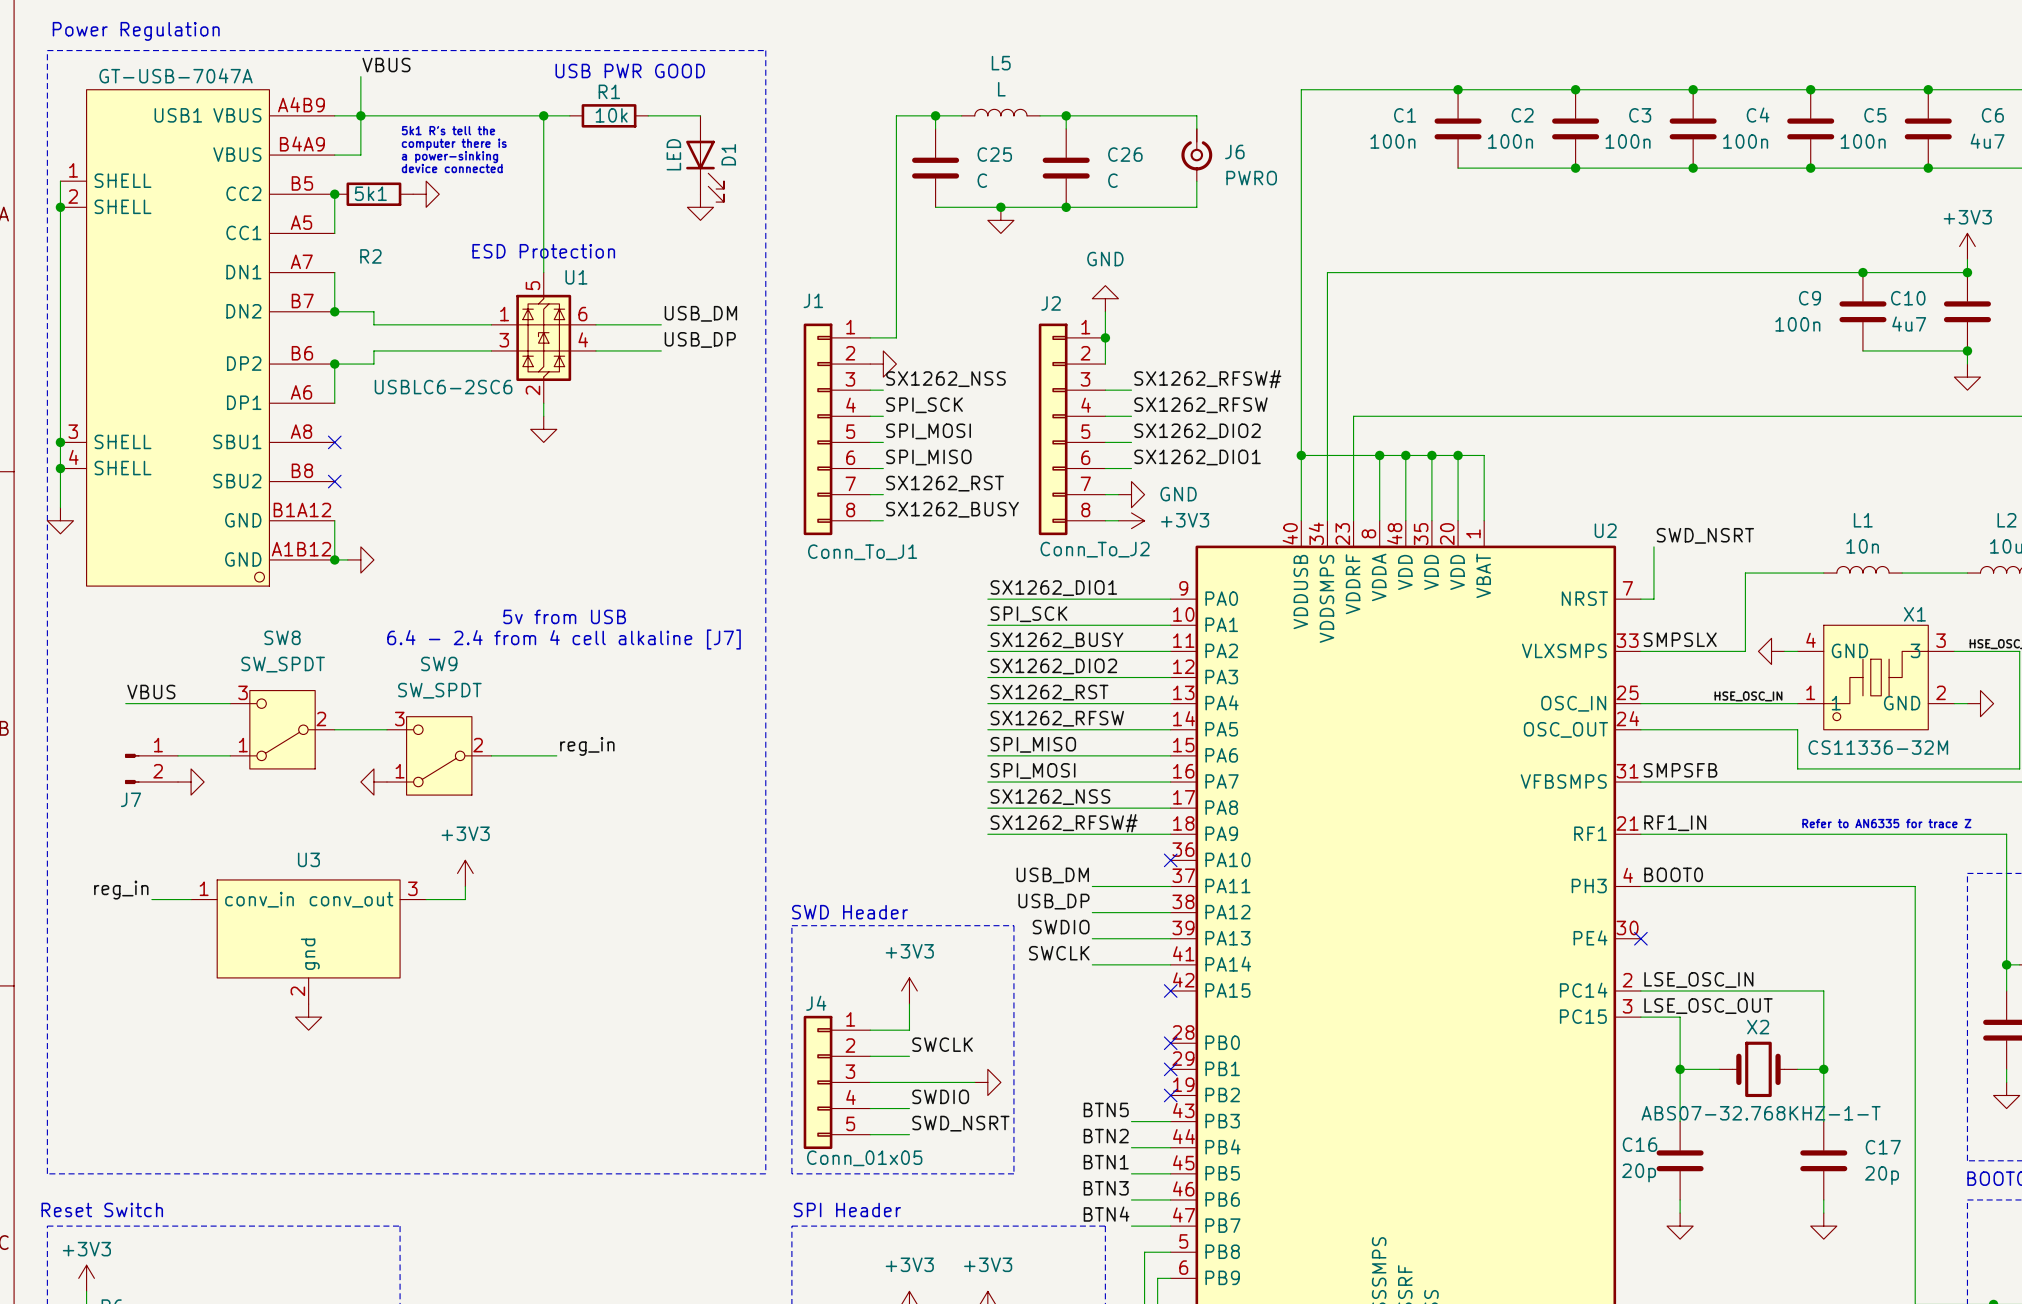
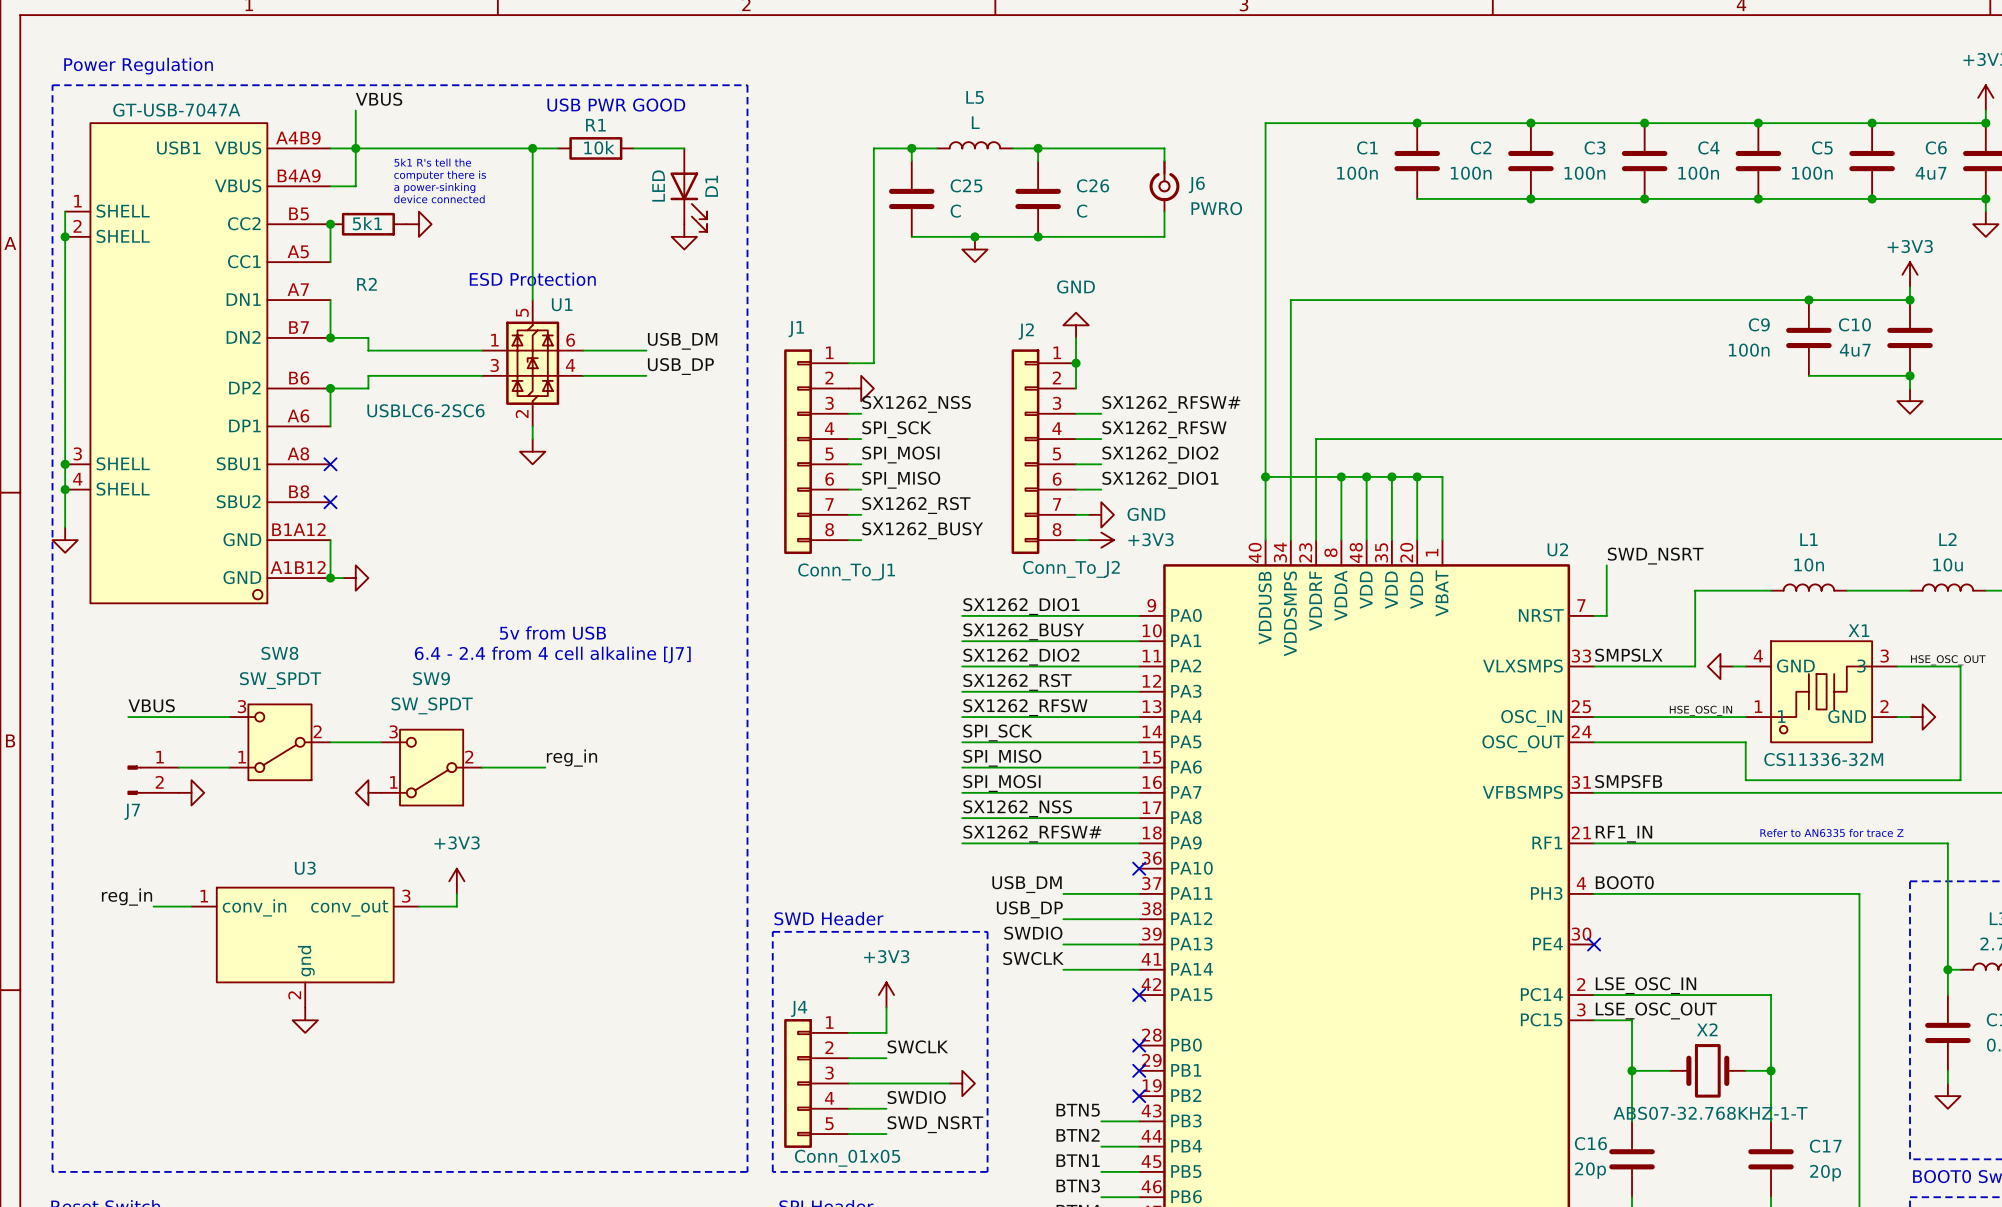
label: SPI_SCK (1028, 614) -> SX1262_BUSY (1023, 631)
label: SX1262_BUSY (1056, 640) -> SX1262_DIO2 (1021, 657)
label: SX1262_DIO2 (1053, 666) -> SX1262_RST (1017, 682)
label: SX1262_RST (1049, 692) -> SX1262_RFSW (1025, 707)
label: SX1262_RFSW (1057, 718) -> SPI_SCK (997, 732)

